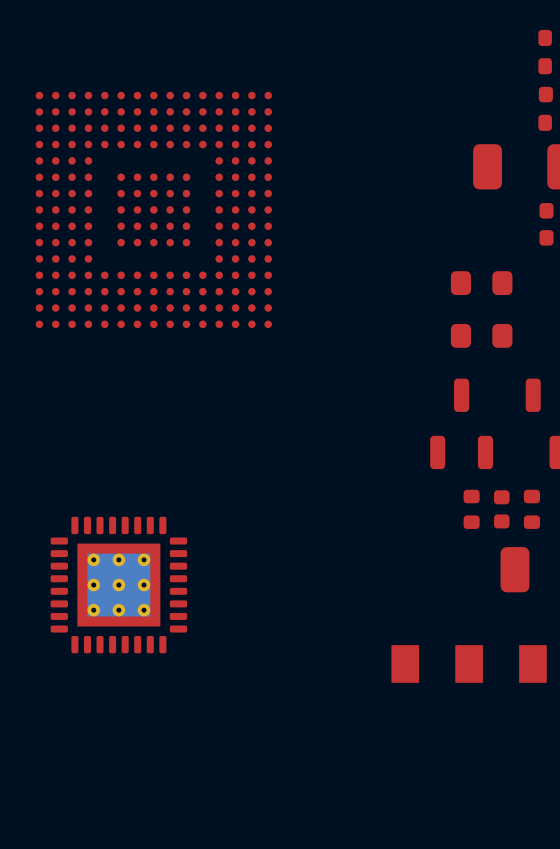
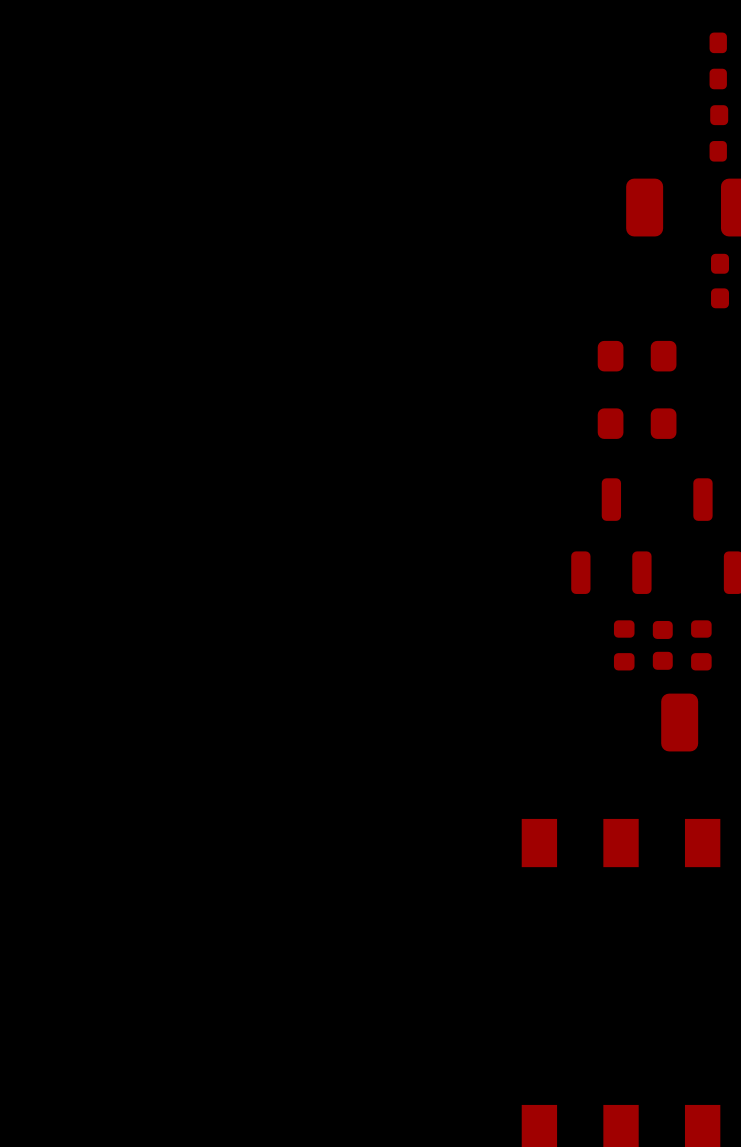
part: (153, 209) -> none
part: (118, 585) -> none

